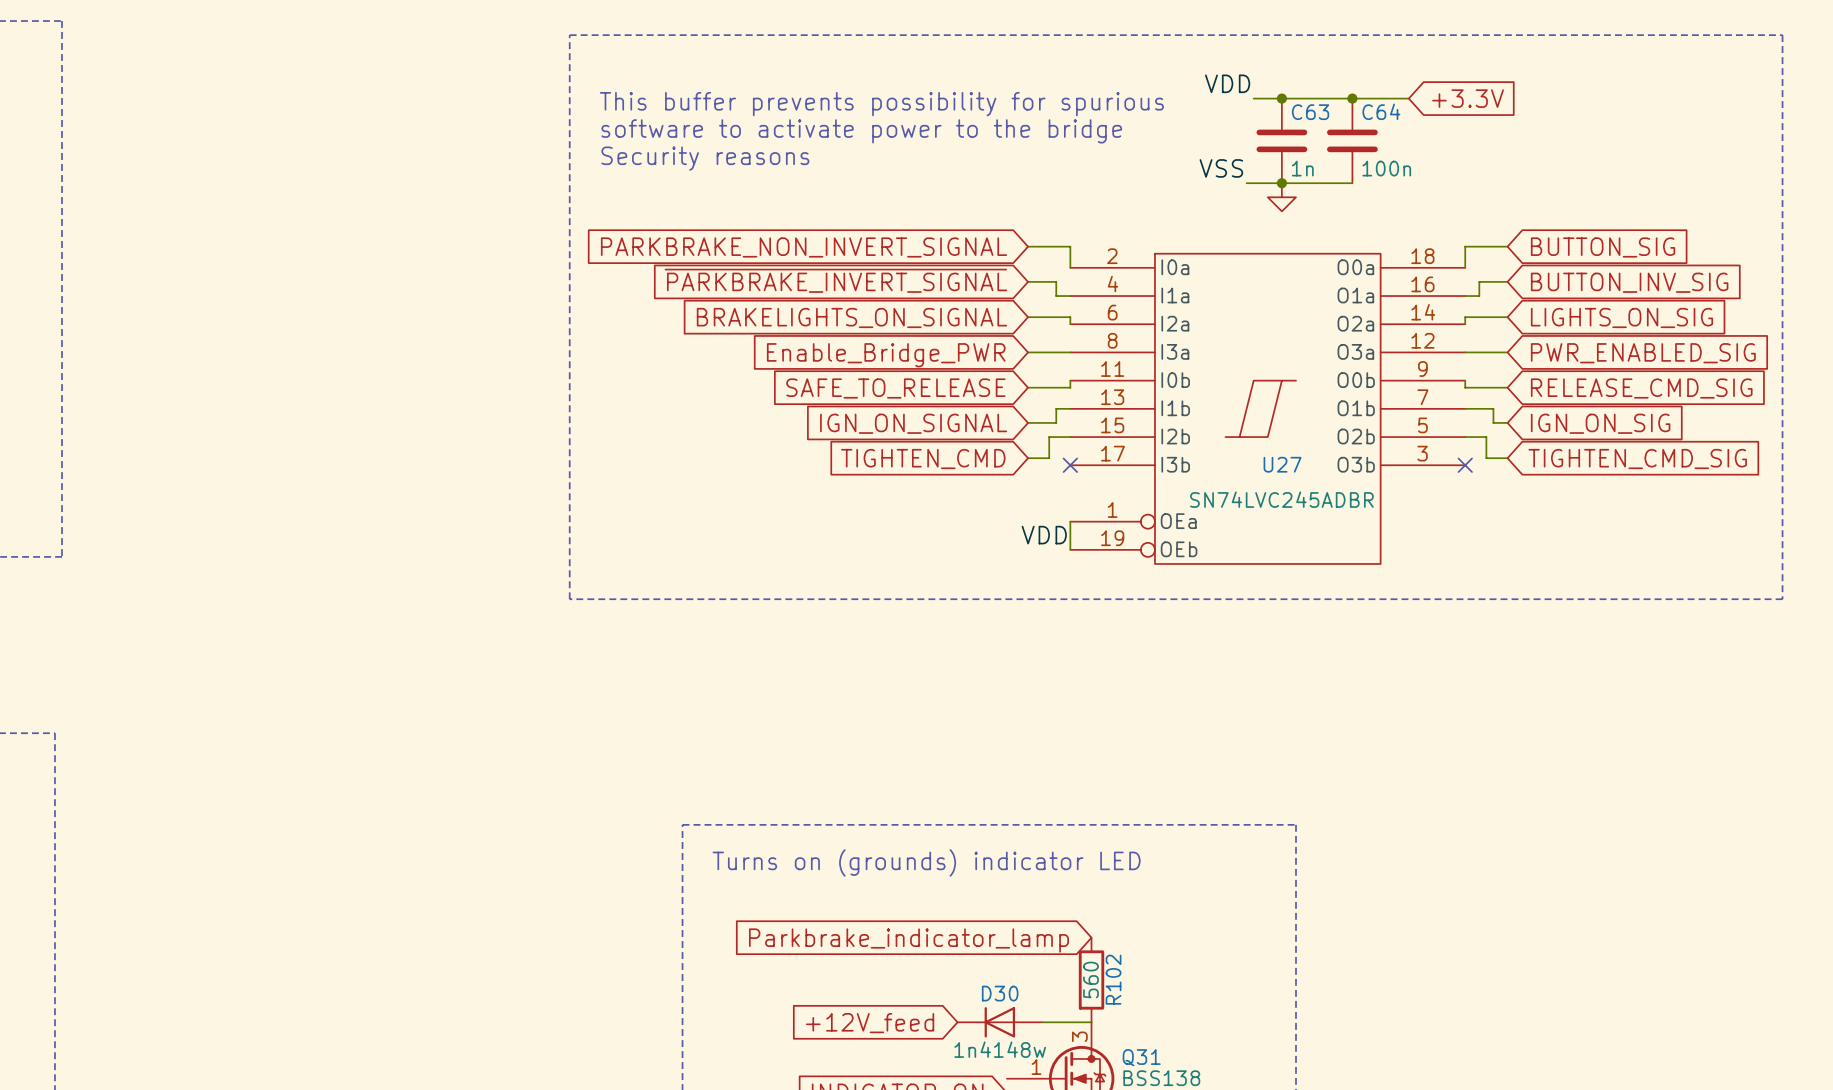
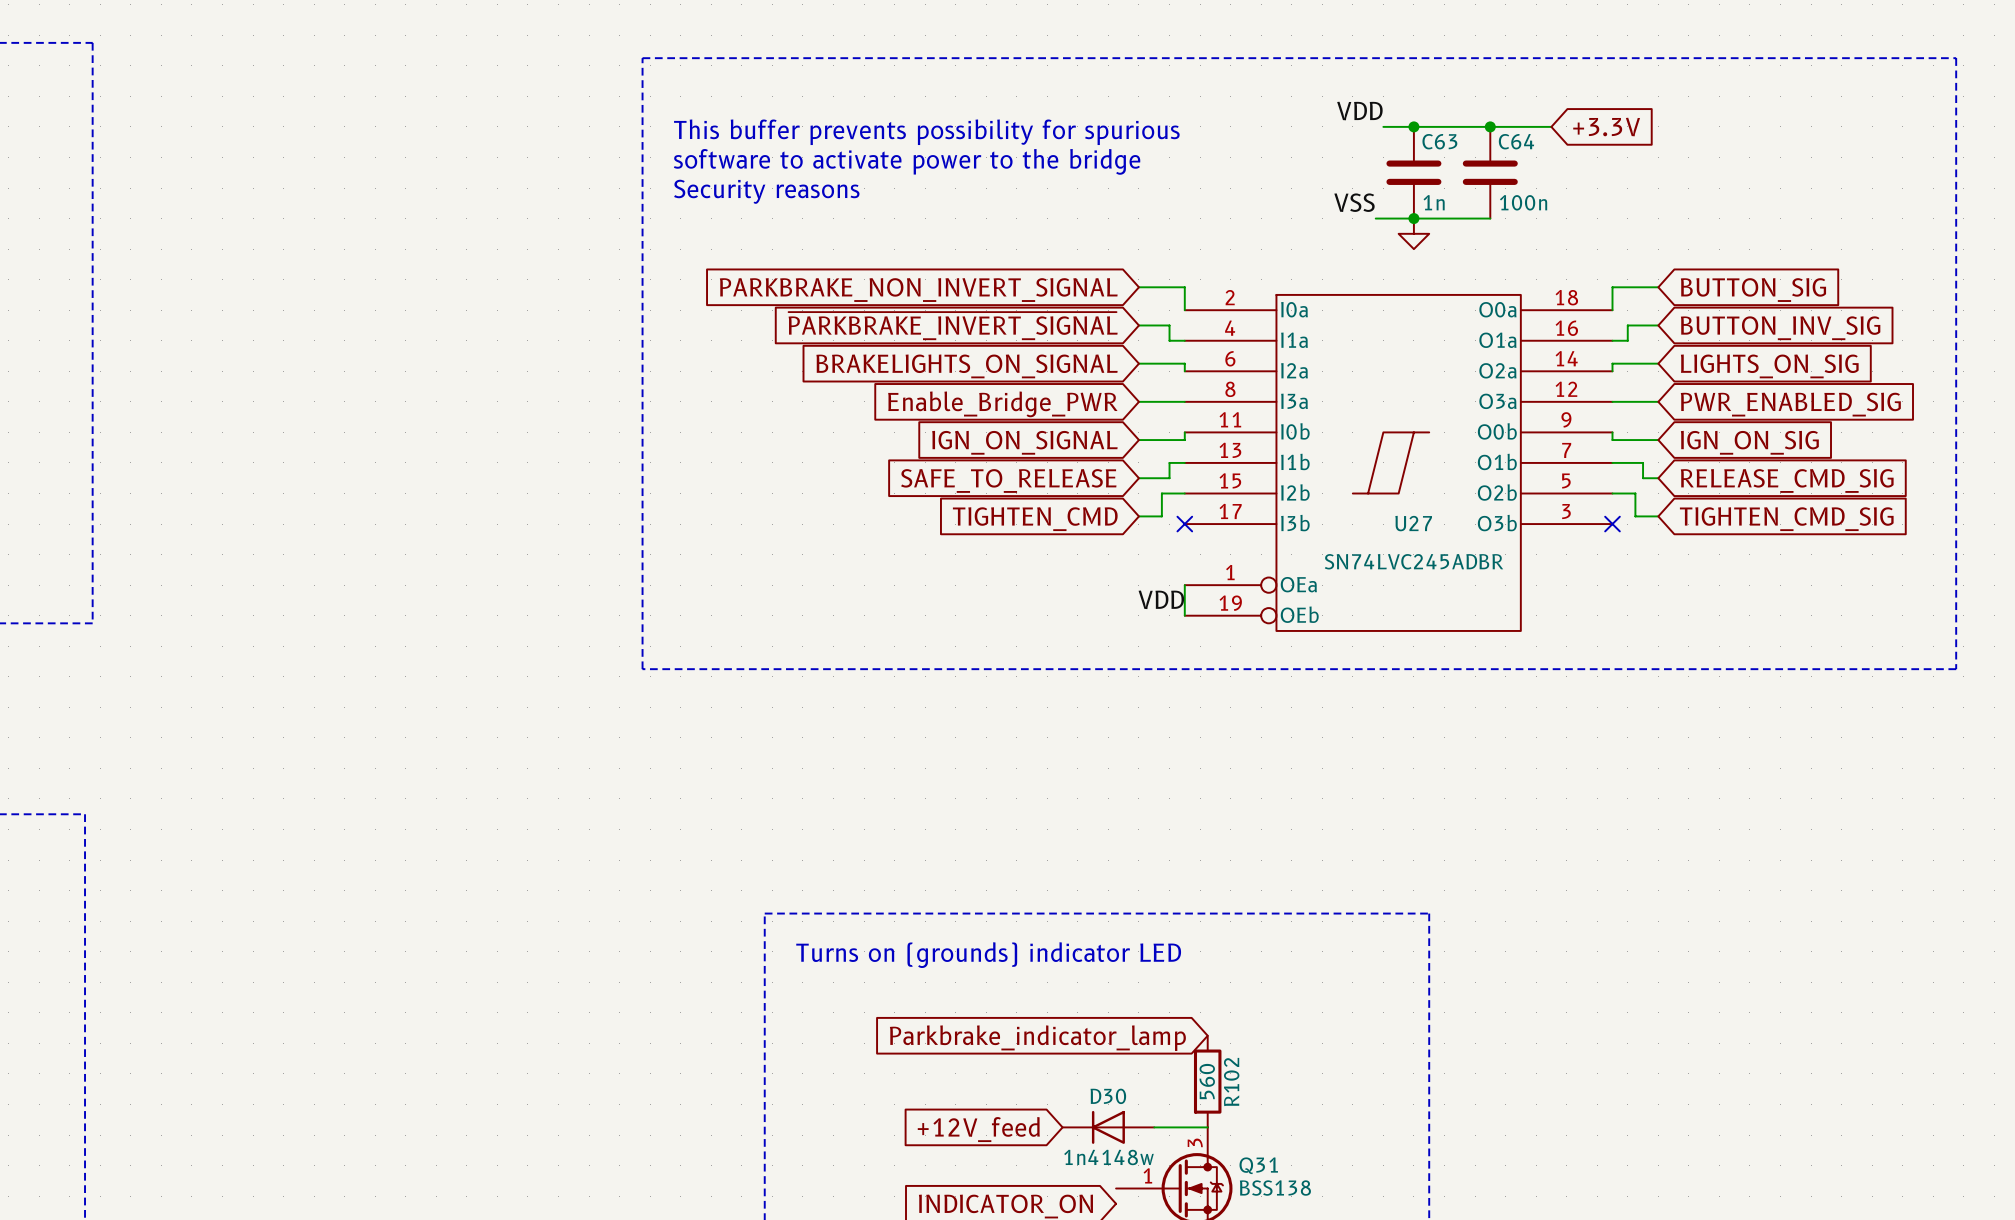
global label: SAFE_TO_RELEASE (895, 388) -> IGN_ON_SIGNAL (1024, 442)
global label: RELEASE_CMD_SIG (1641, 388) -> IGN_ON_SIG (1749, 442)
global label: IGN_ON_SIGNAL (913, 423) -> SAFE_TO_RELEASE (1008, 480)
global label: IGN_ON_SIG (1600, 423) -> RELEASE_CMD_SIG (1787, 480)

